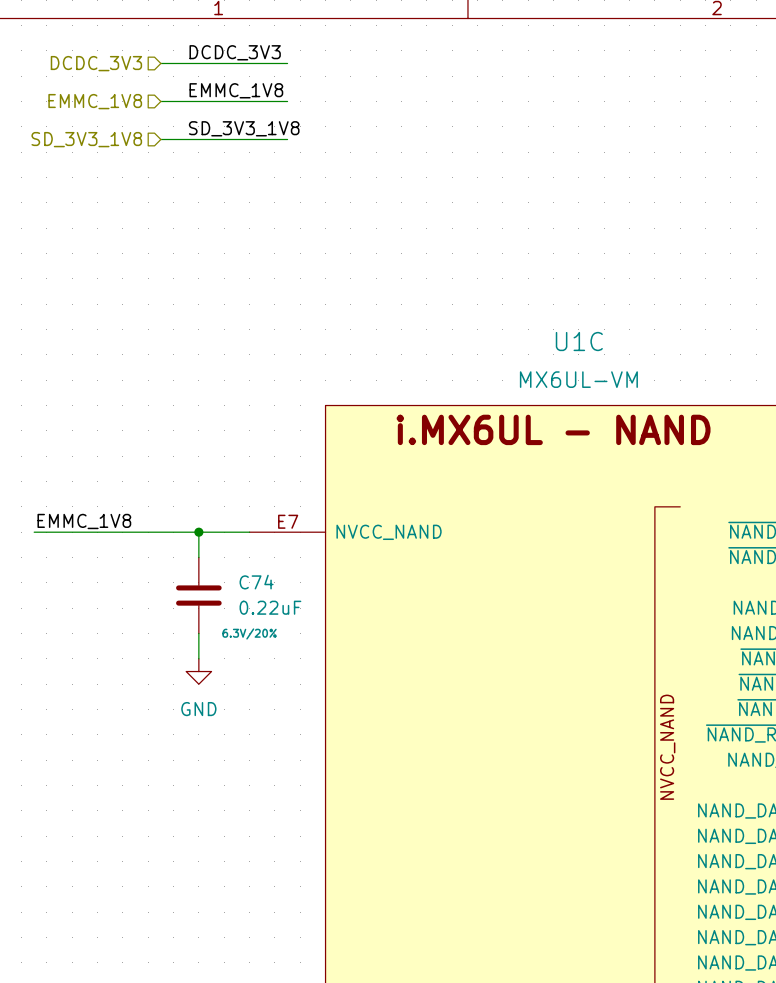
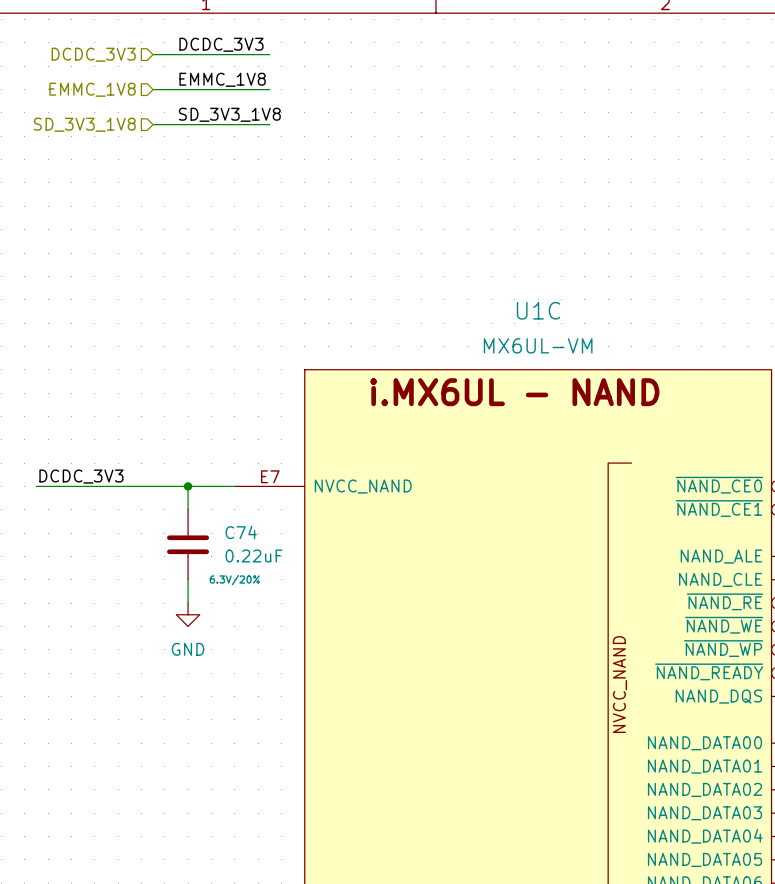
label: EMMC_1V8 (84, 521) -> DCDC_3V3 (81, 476)

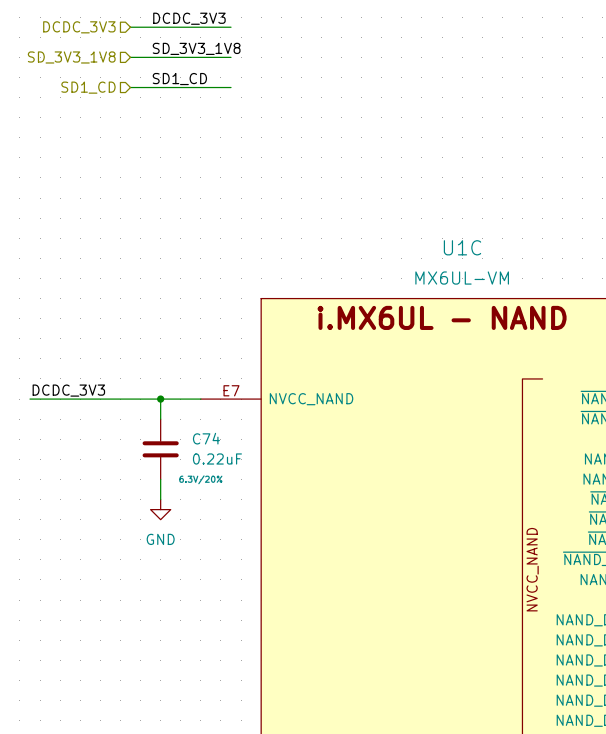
label: EMMC_1V8 (222, 79) -> SD_3V3_1V8 (196, 48)
hierarchical label: EMMC_1V8 (92, 89) -> SD_3V3_1V8 (71, 57)
label: SD_3V3_1V8 (229, 114) -> SD1_CD (179, 79)
hierarchical label: SD_3V3_1V8 (84, 124) -> SD1_CD (88, 87)

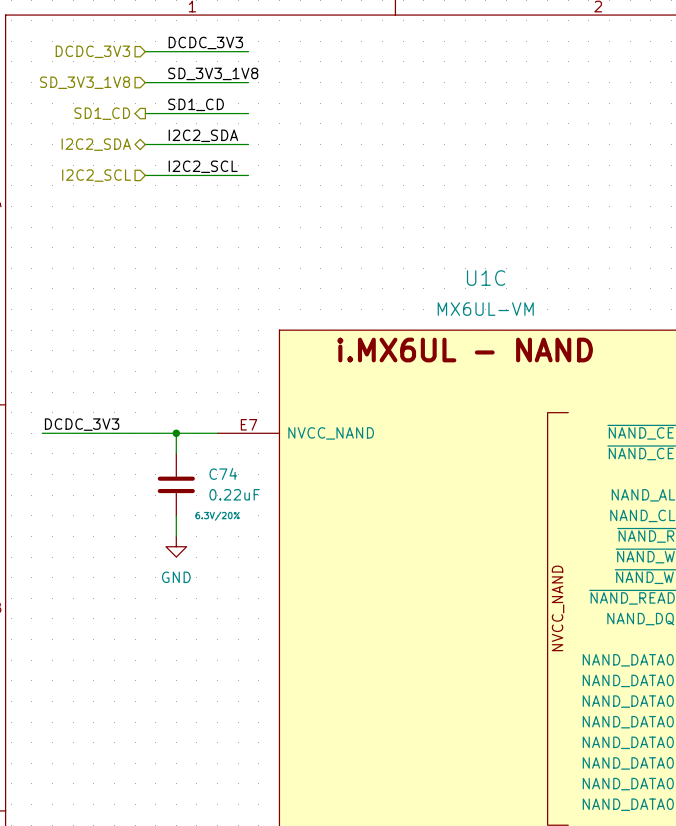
hierarchical label shape: input (88, 87) -> output (102, 113)
label: none -> I2C2_SDA (203, 135)
hierarchical label: none -> I2C2_SDA (96, 144)
wire: none -> (145, 144) (248, 144)
label: none -> I2C2_SCL (203, 166)
hierarchical label: none -> I2C2_SCL (96, 175)
wire: none -> (145, 175) (248, 175)

